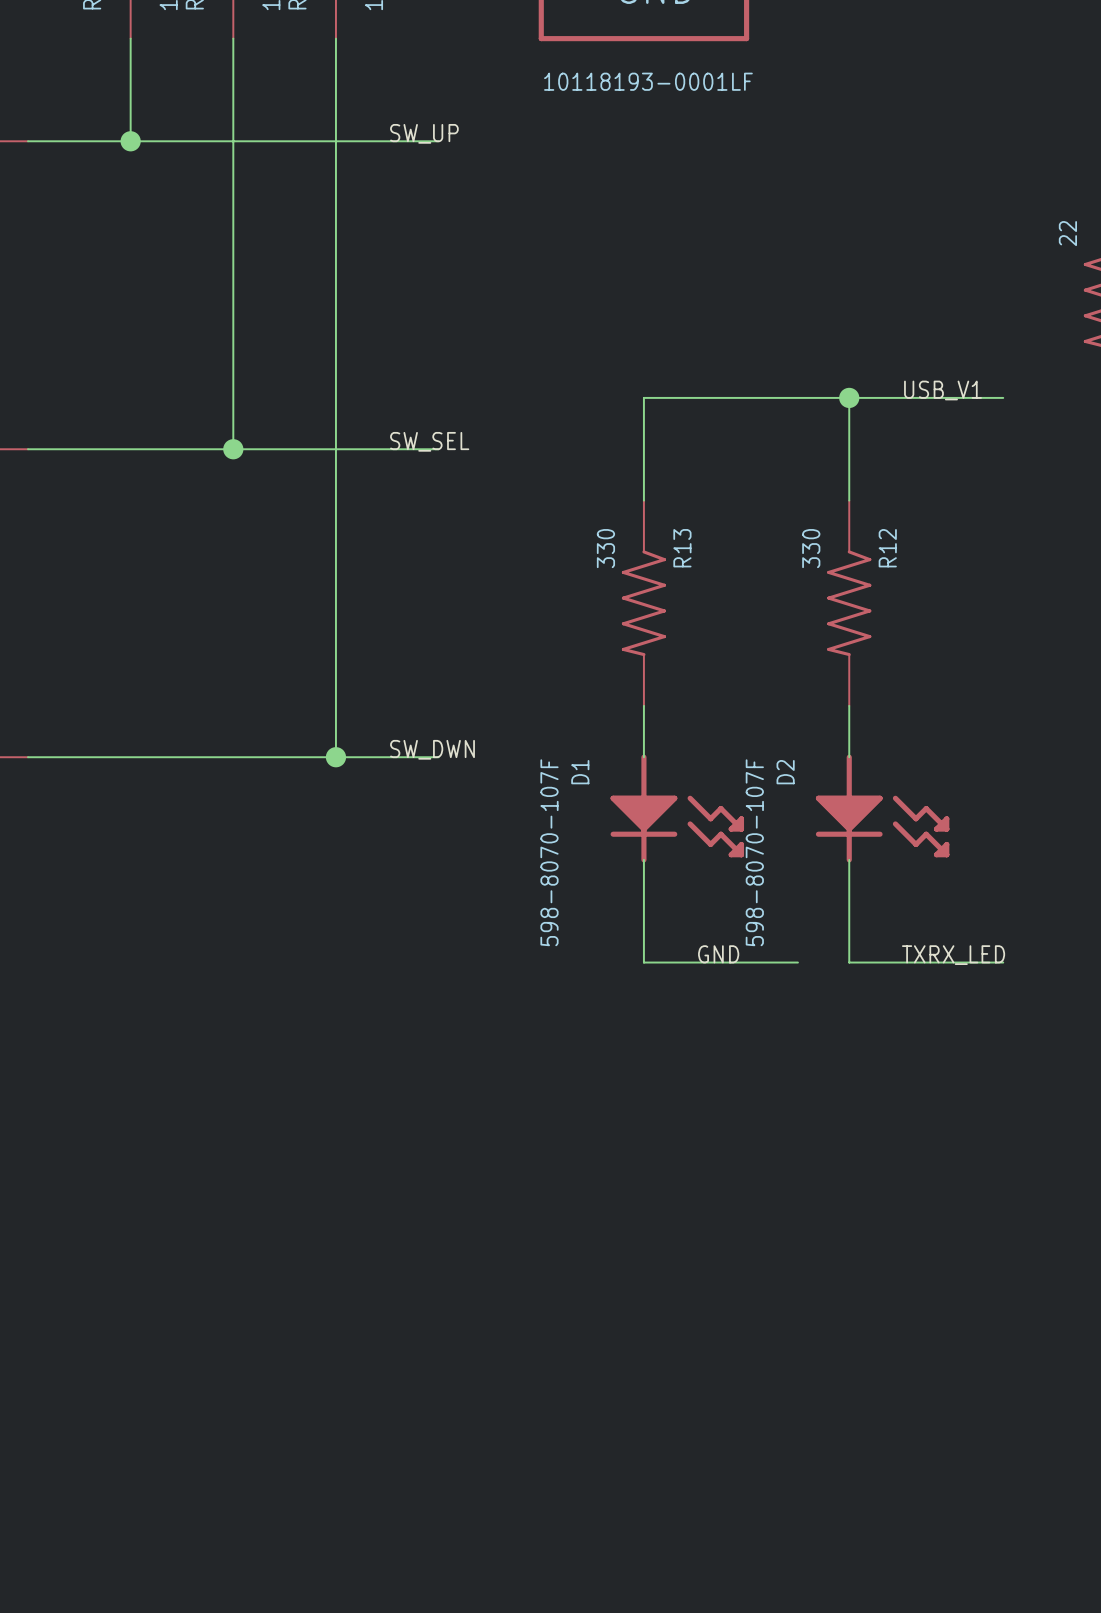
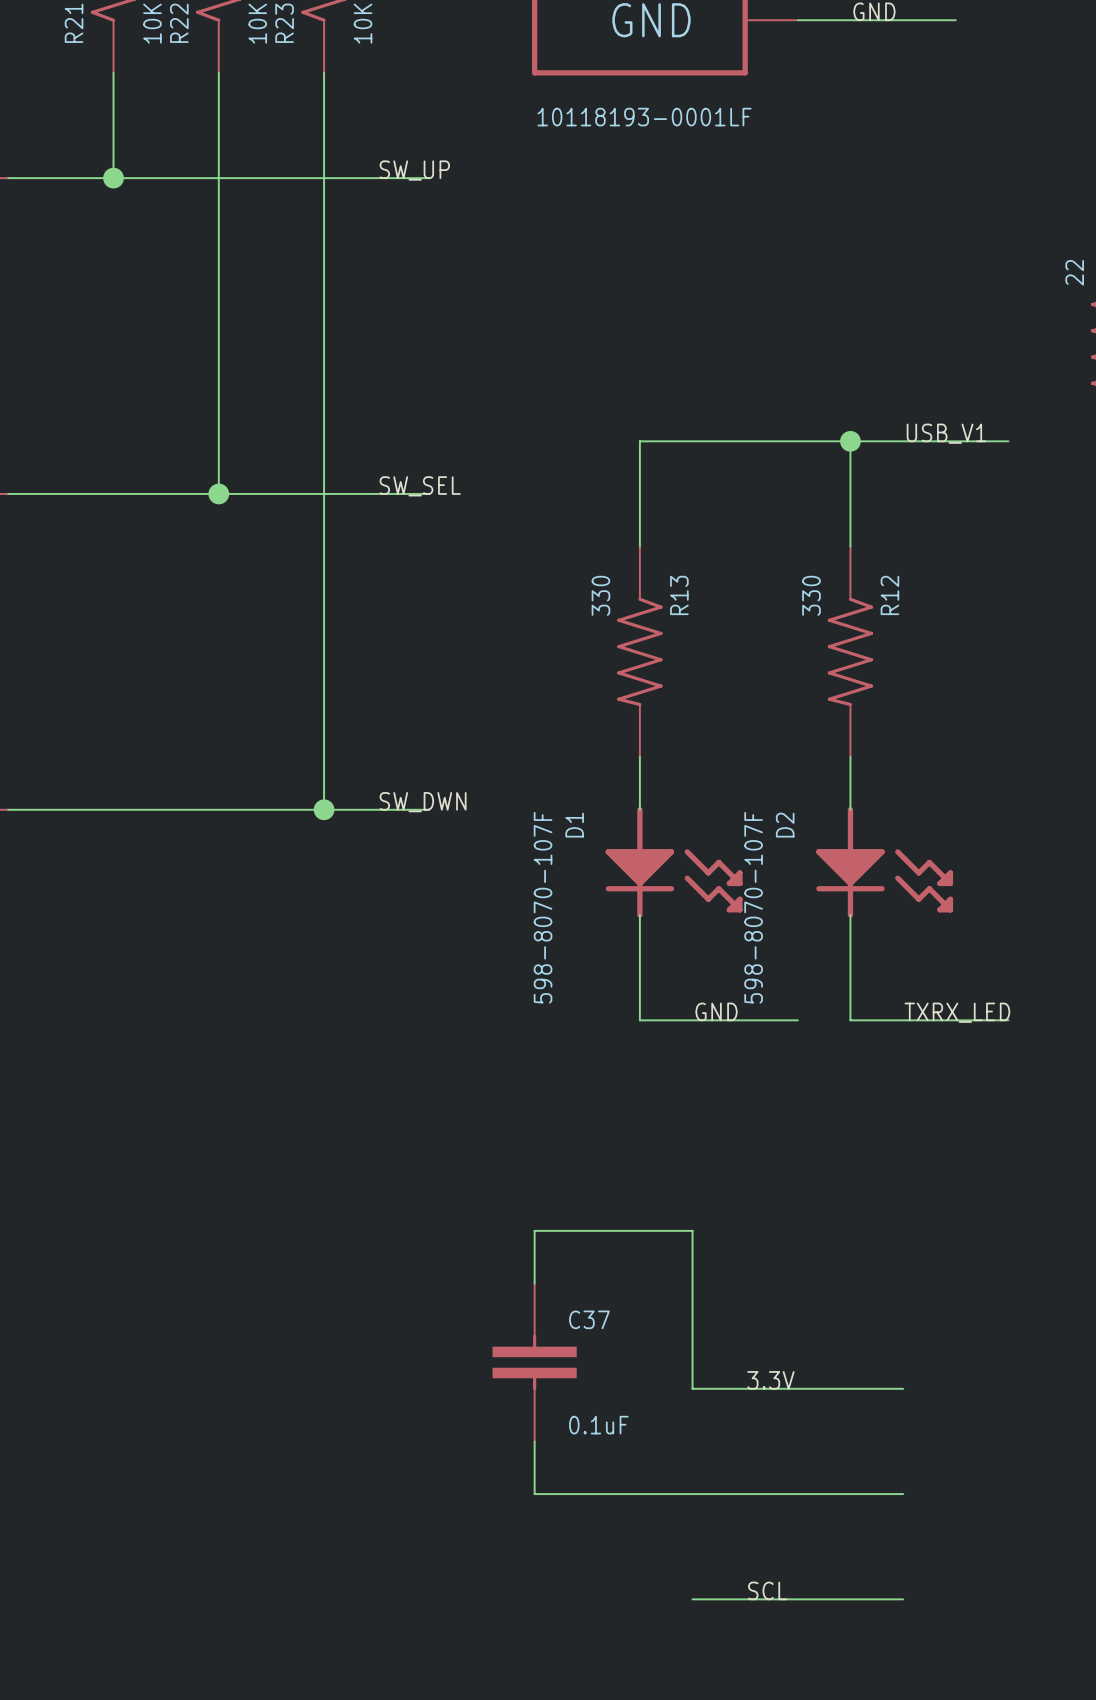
wire: none -> (534, 1283) (534, 1230) (692, 1230) (692, 1388) (903, 1388)
C37: none -> 0.1uF (534, 1362)
label: none -> 3.3V (770, 1380)
wire: none -> (534, 1441) (534, 1494) (903, 1494)
label: none -> SCL (767, 1590)
wire: none -> (692, 1599) (903, 1599)

